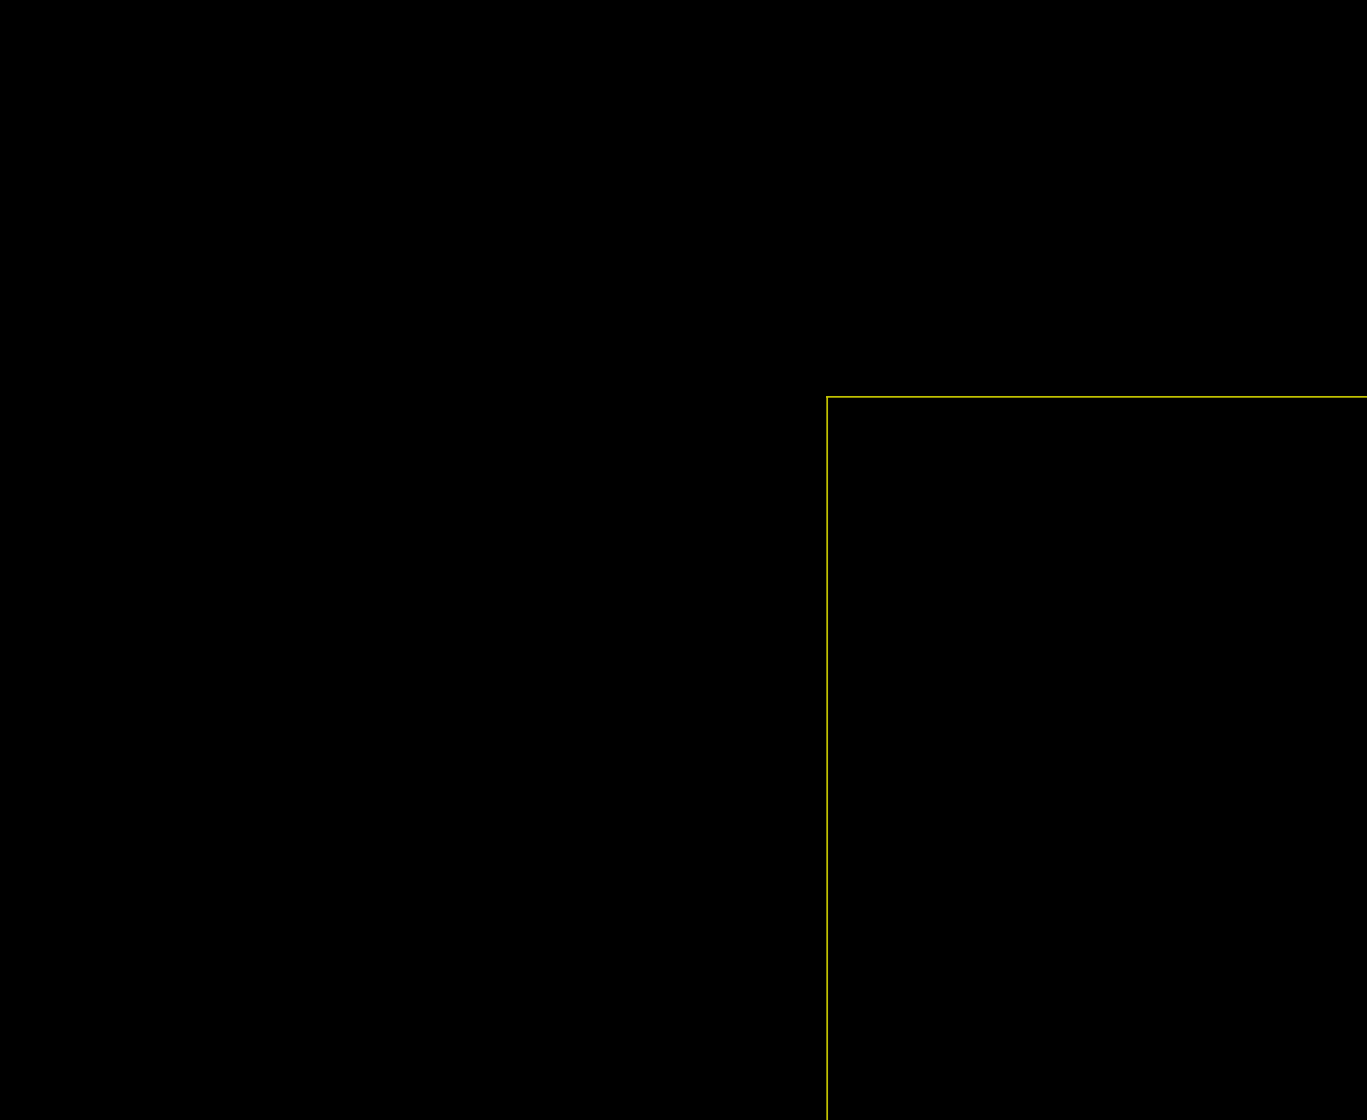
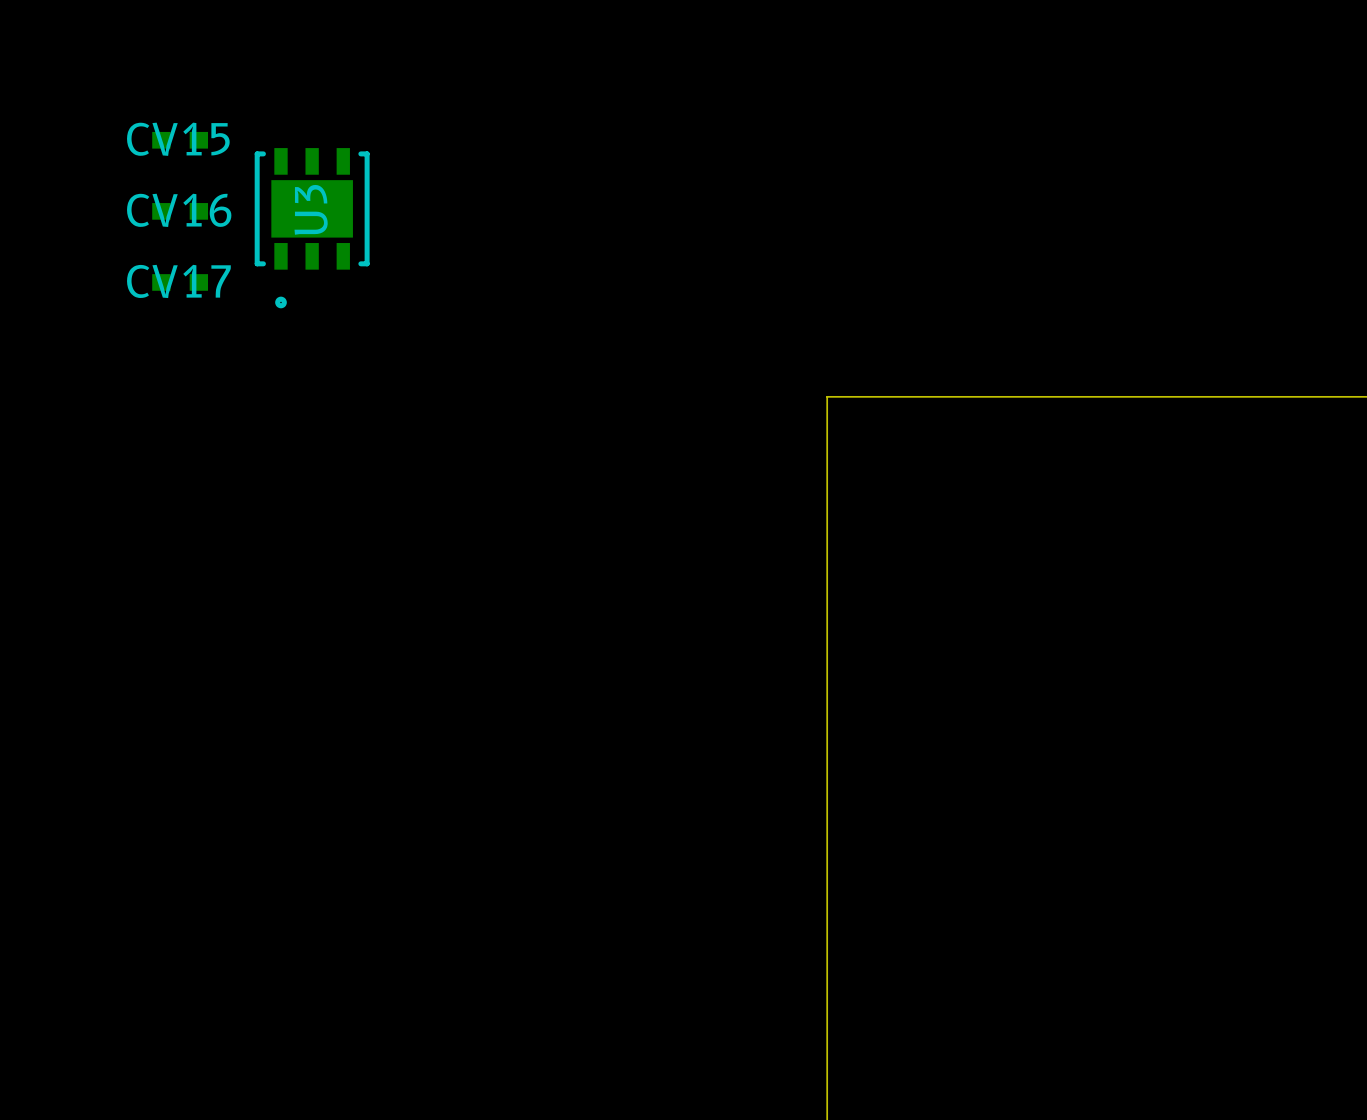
CV15: none -> (180, 140)
CV16: none -> (180, 211)
U3: none -> (312, 228)
CV17: none -> (180, 282)

